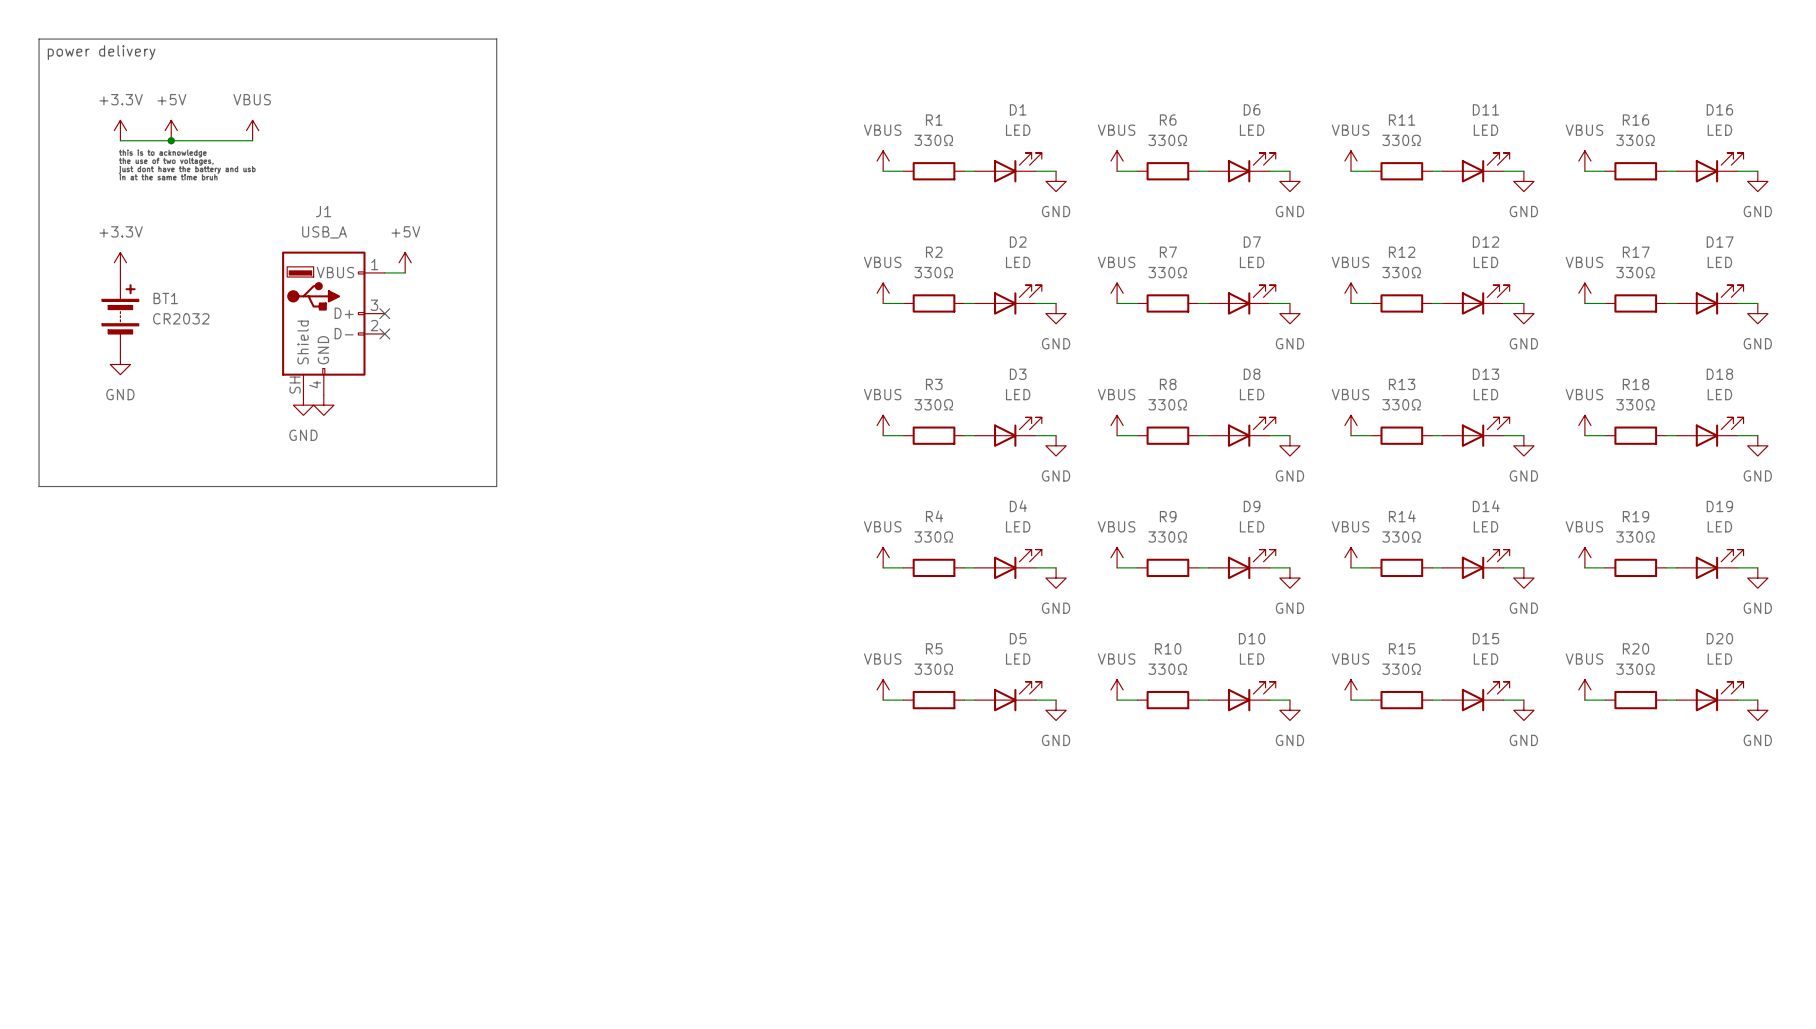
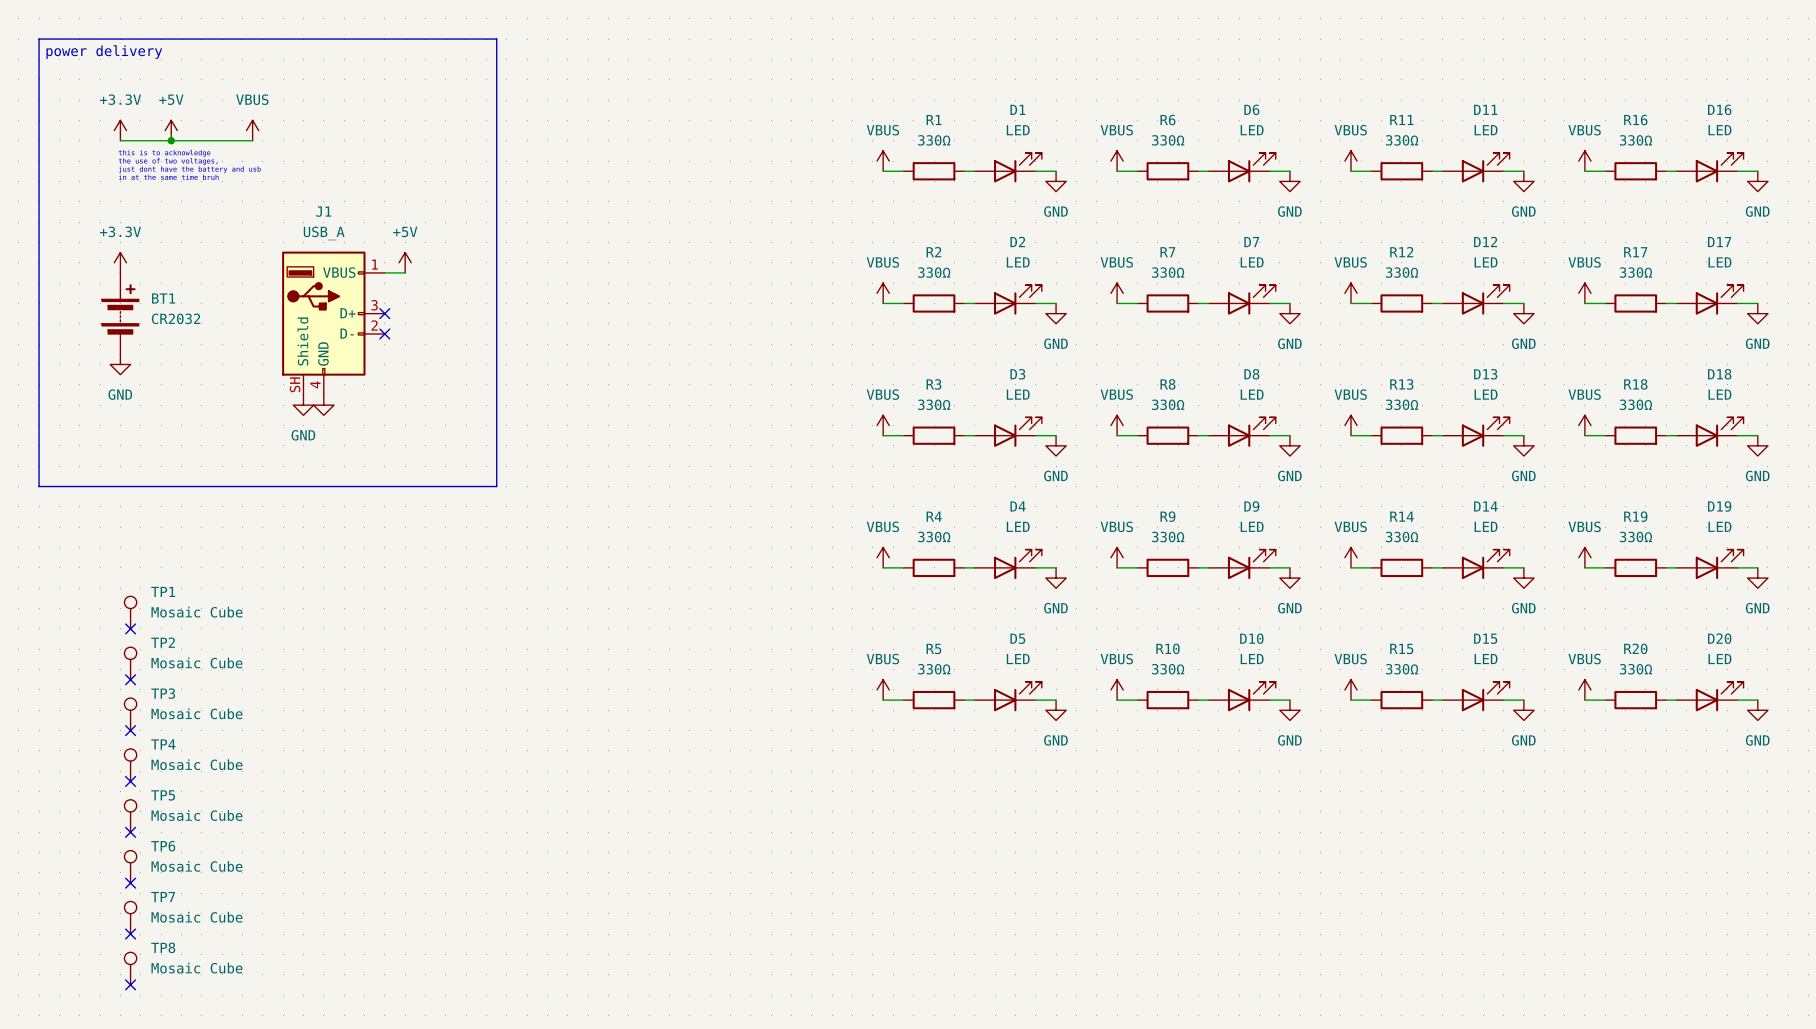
TP1: none -> Mosaic Cube (130, 612)
no-connect mark: none -> (130, 628)
TP2: none -> Mosaic Cube (130, 663)
no-connect mark: none -> (130, 679)
TP3: none -> Mosaic Cube (130, 714)
no-connect mark: none -> (130, 730)
TP4: none -> Mosaic Cube (130, 765)
no-connect mark: none -> (130, 781)
TP5: none -> Mosaic Cube (130, 816)
no-connect mark: none -> (130, 832)
TP6: none -> Mosaic Cube (130, 866)
no-connect mark: none -> (130, 883)
TP7: none -> Mosaic Cube (130, 917)
no-connect mark: none -> (130, 934)
TP8: none -> Mosaic Cube (130, 968)
no-connect mark: none -> (130, 984)

